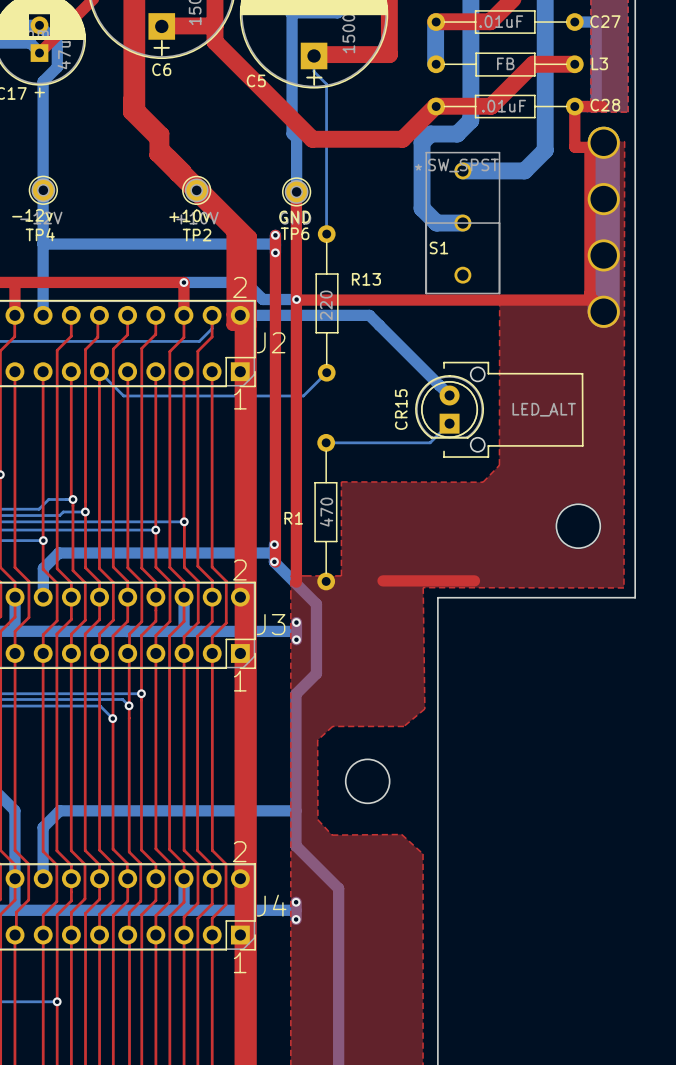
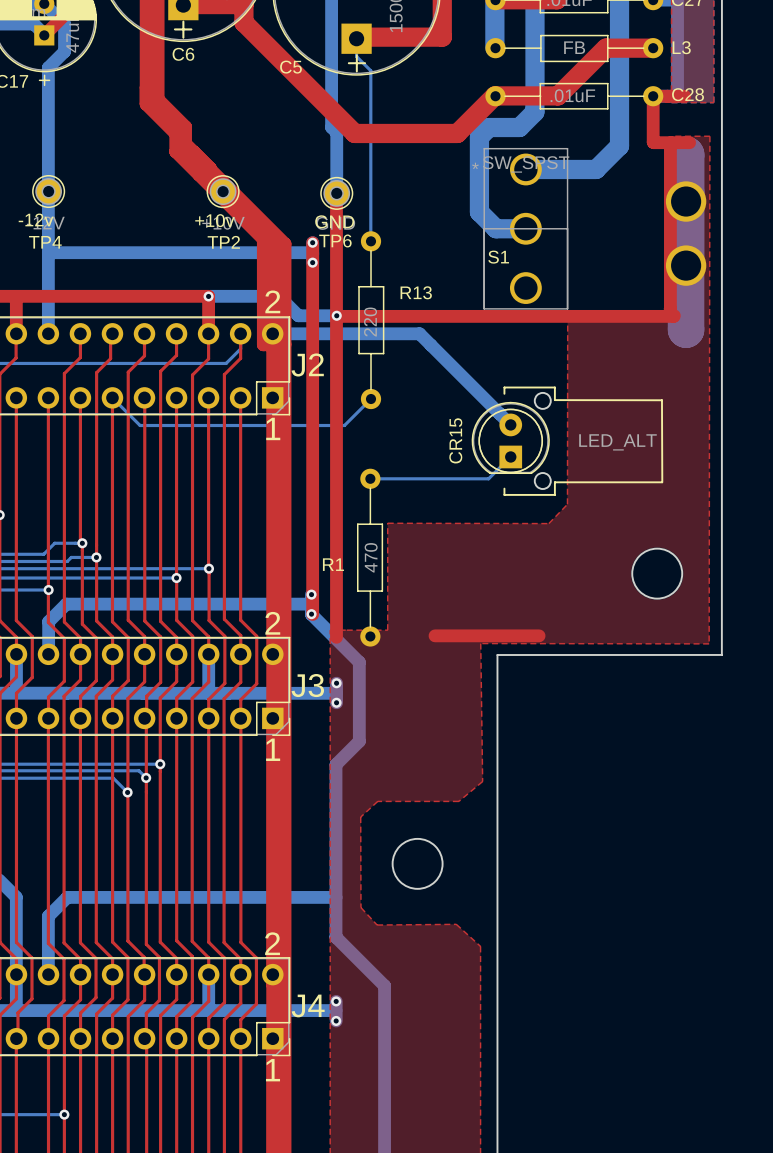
S1 footprint: [425, 126, 620, 328] -> [483, 148, 707, 310]

